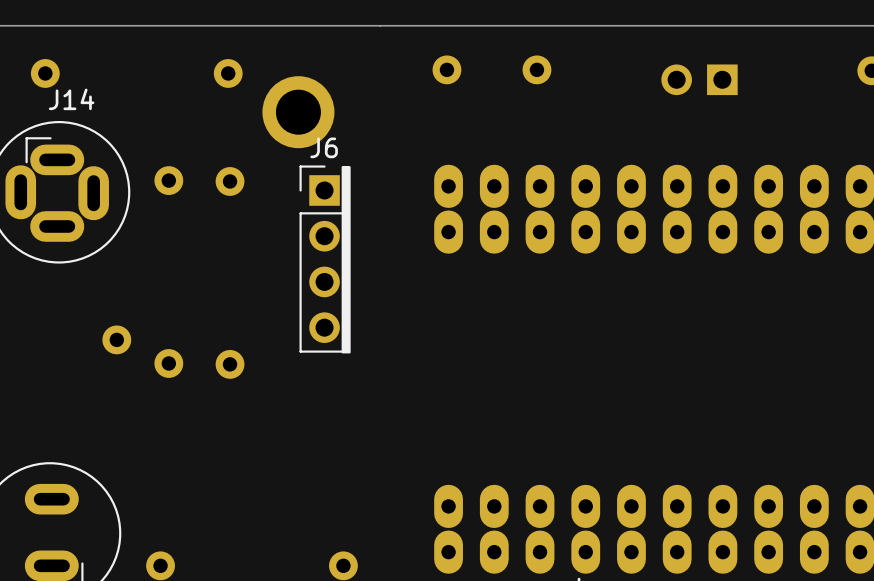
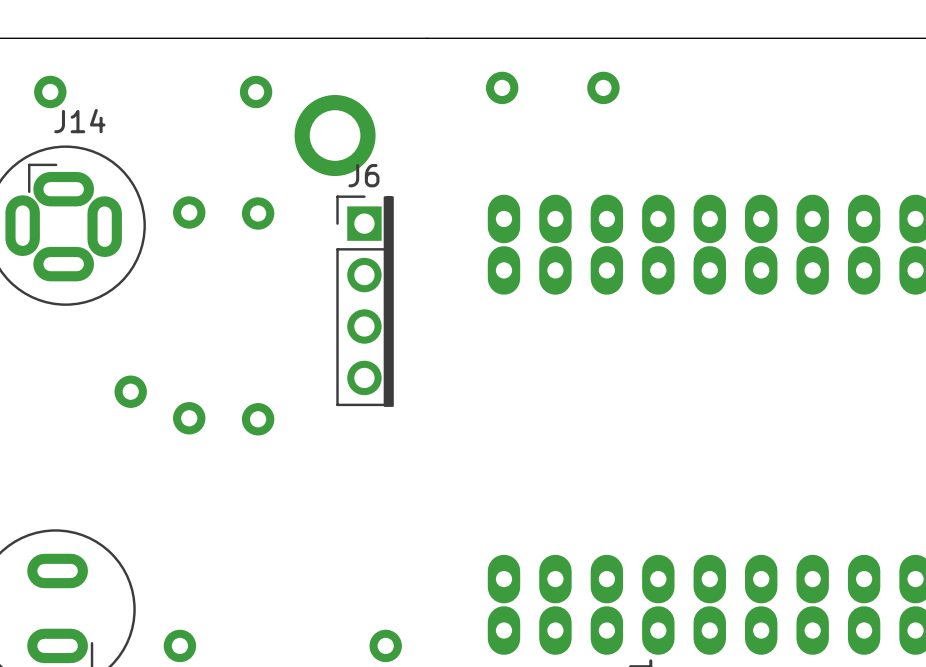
part: (699, 79) -> none

